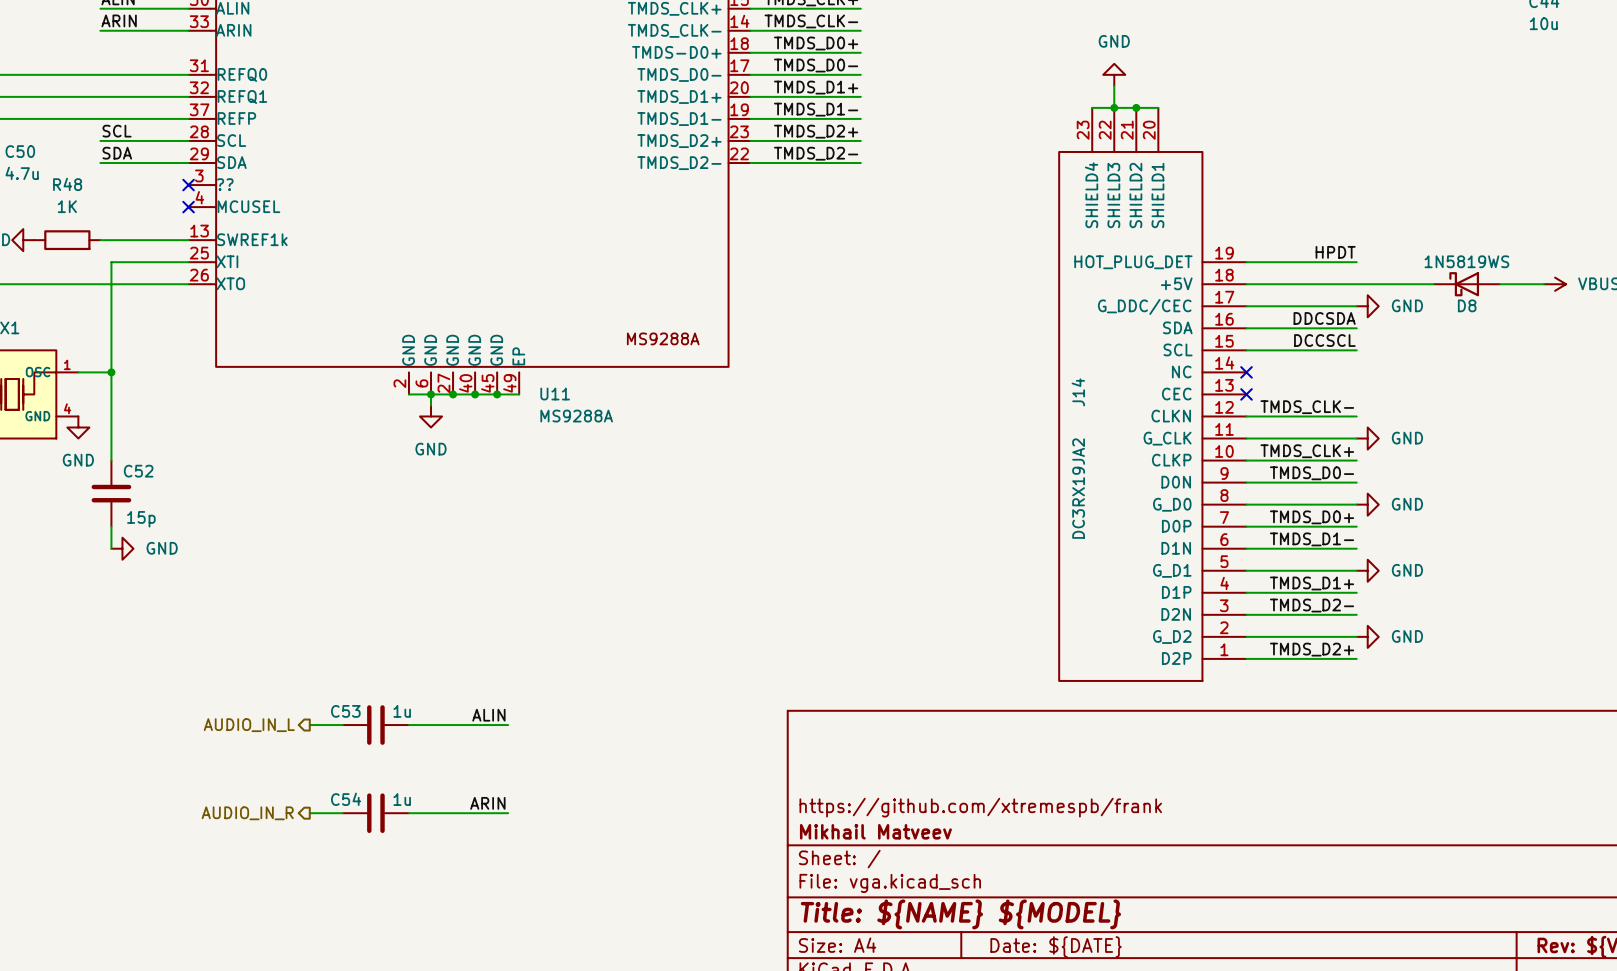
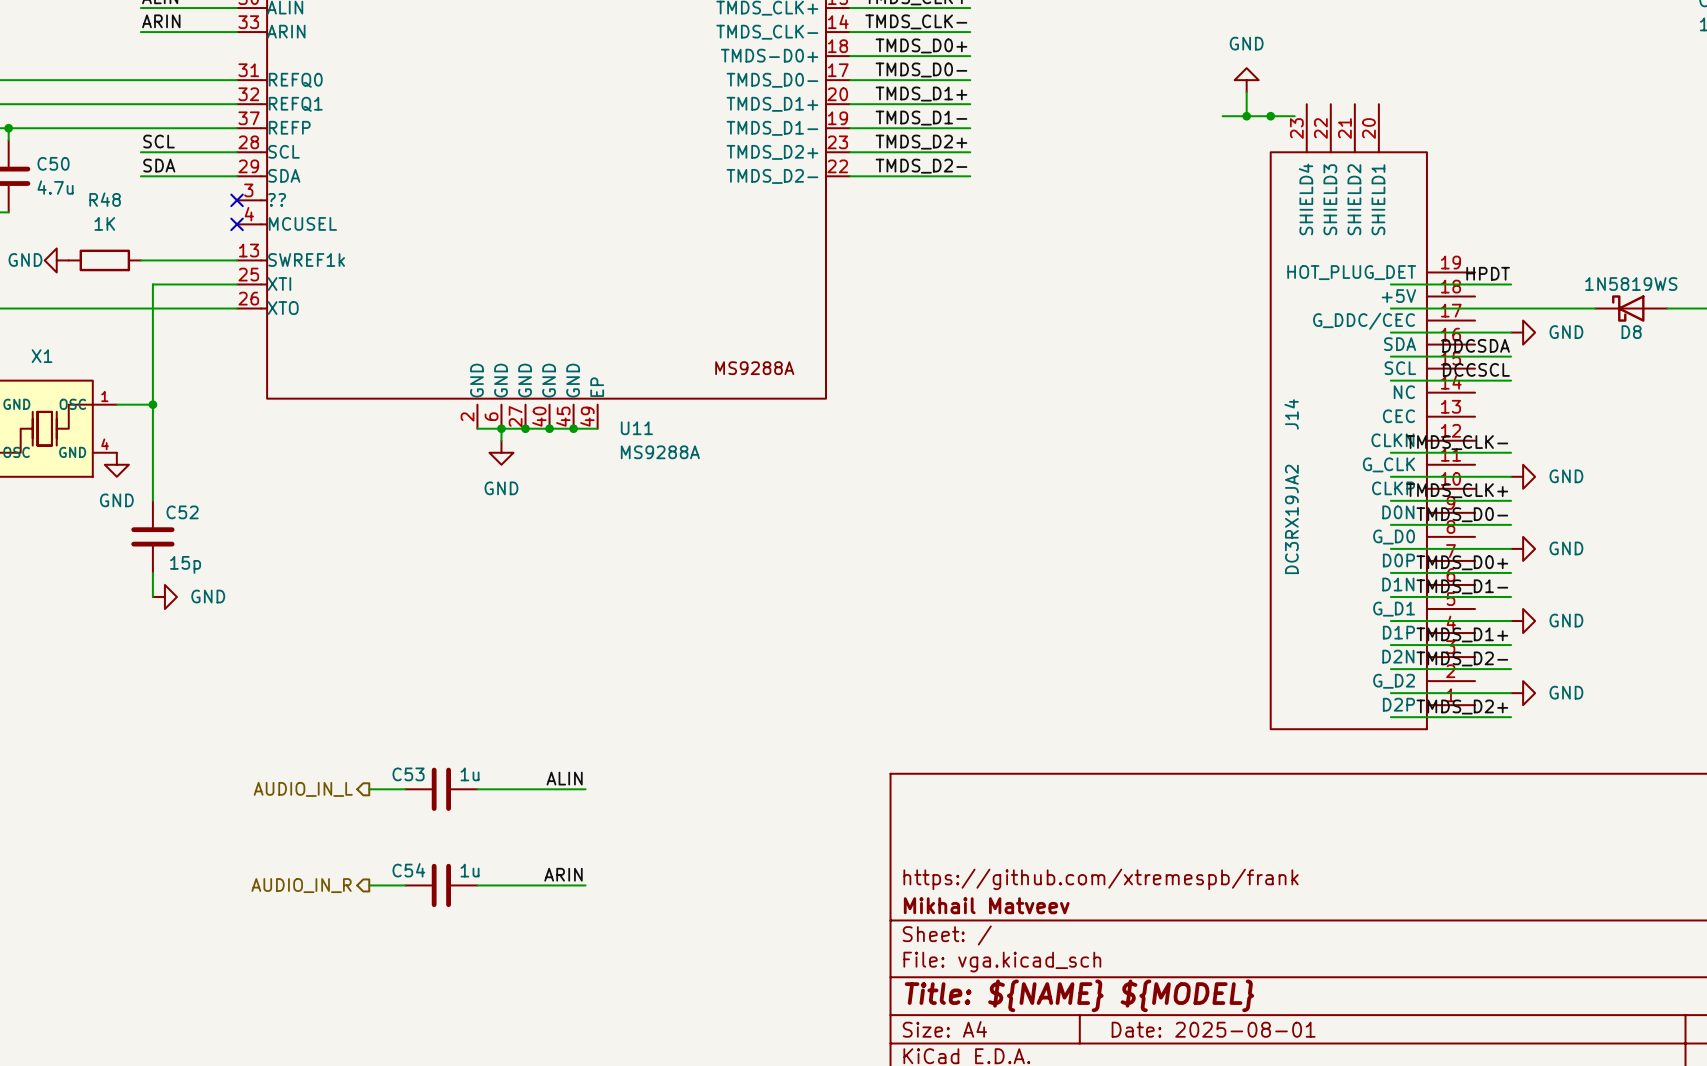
no-connect mark: (1246, 372) -> none
J14 position: (1152, 394) -> (1372, 416)
no-connect mark: (1246, 394) -> none
title block: Date: ${DATE} (1056, 947) -> Date: 2025-08-01 (1213, 1029)

